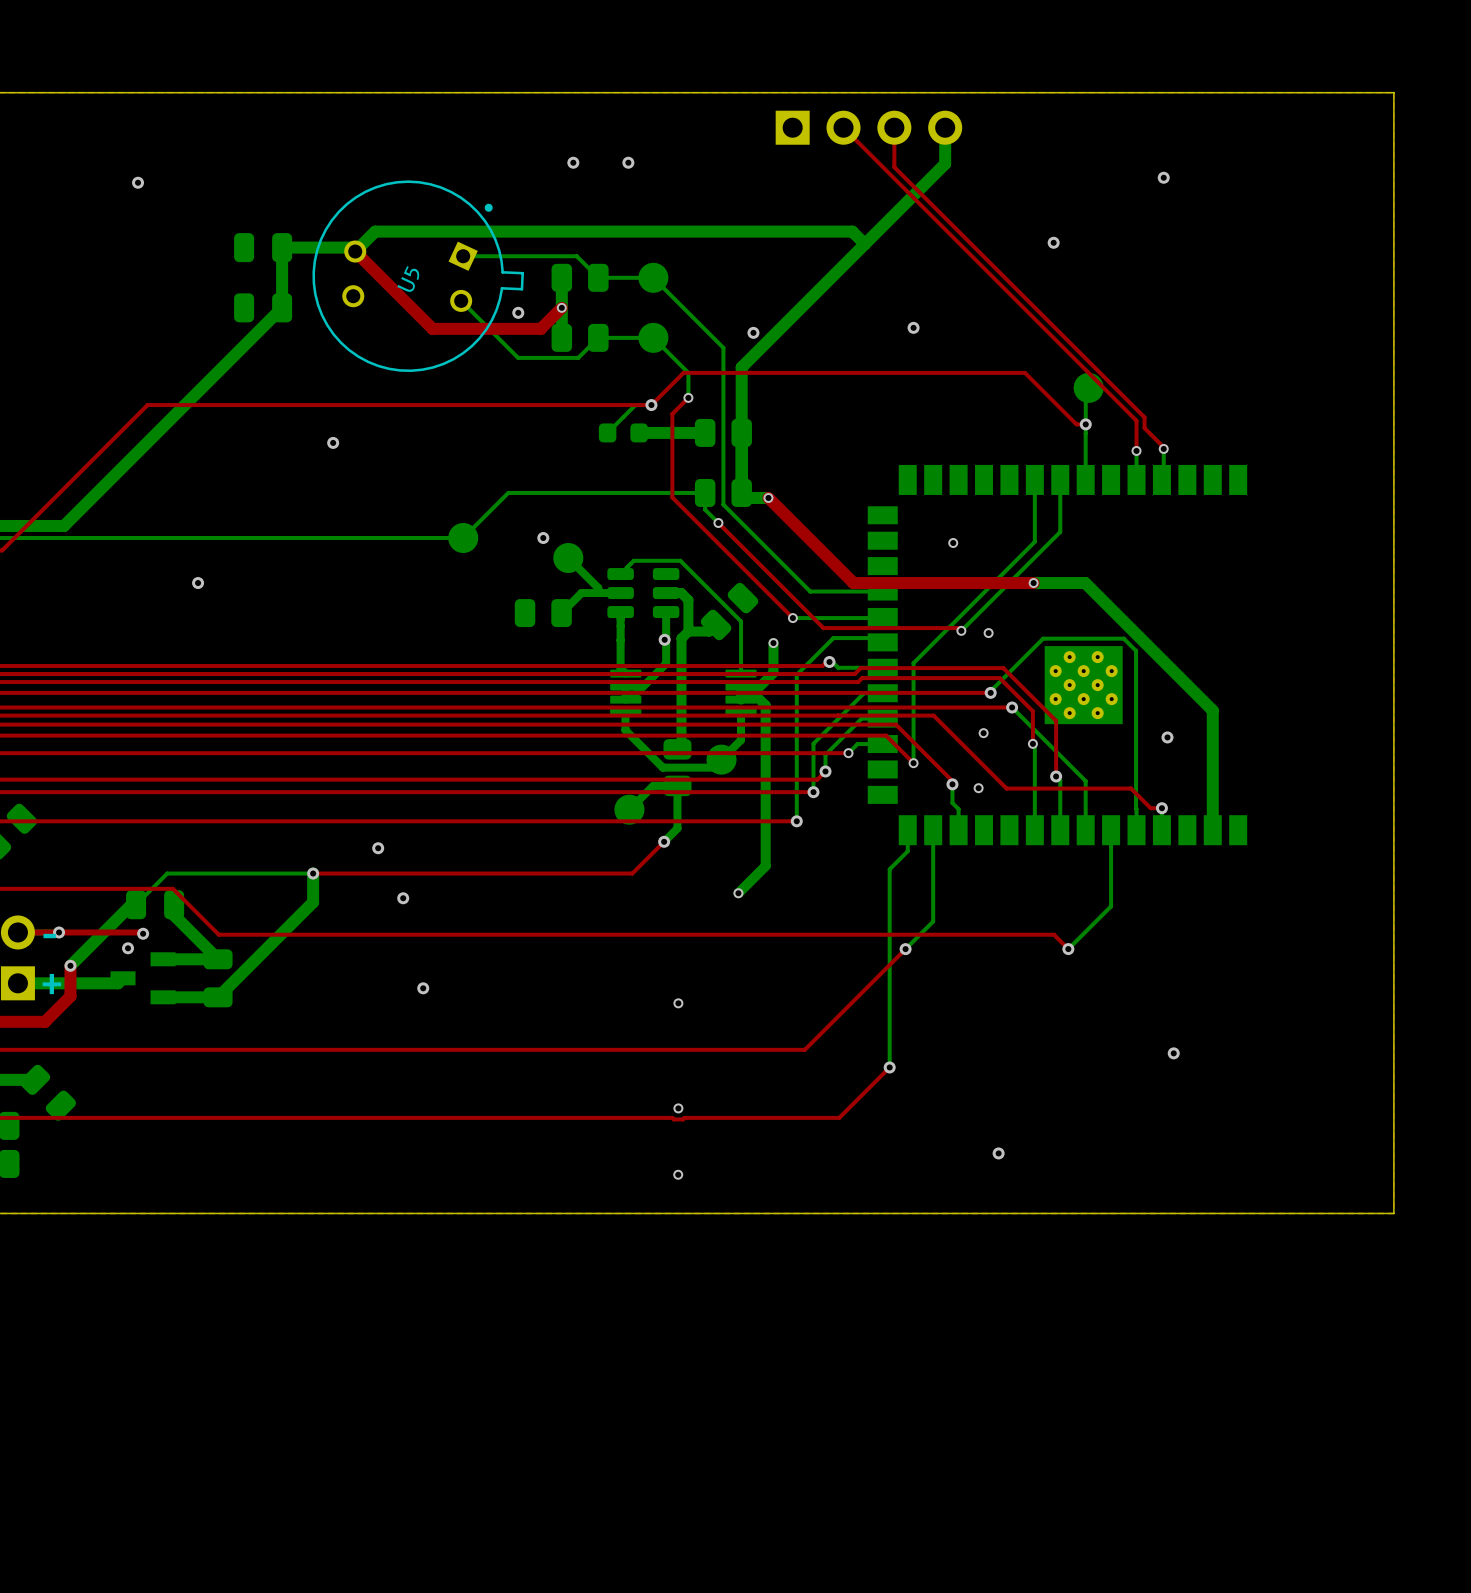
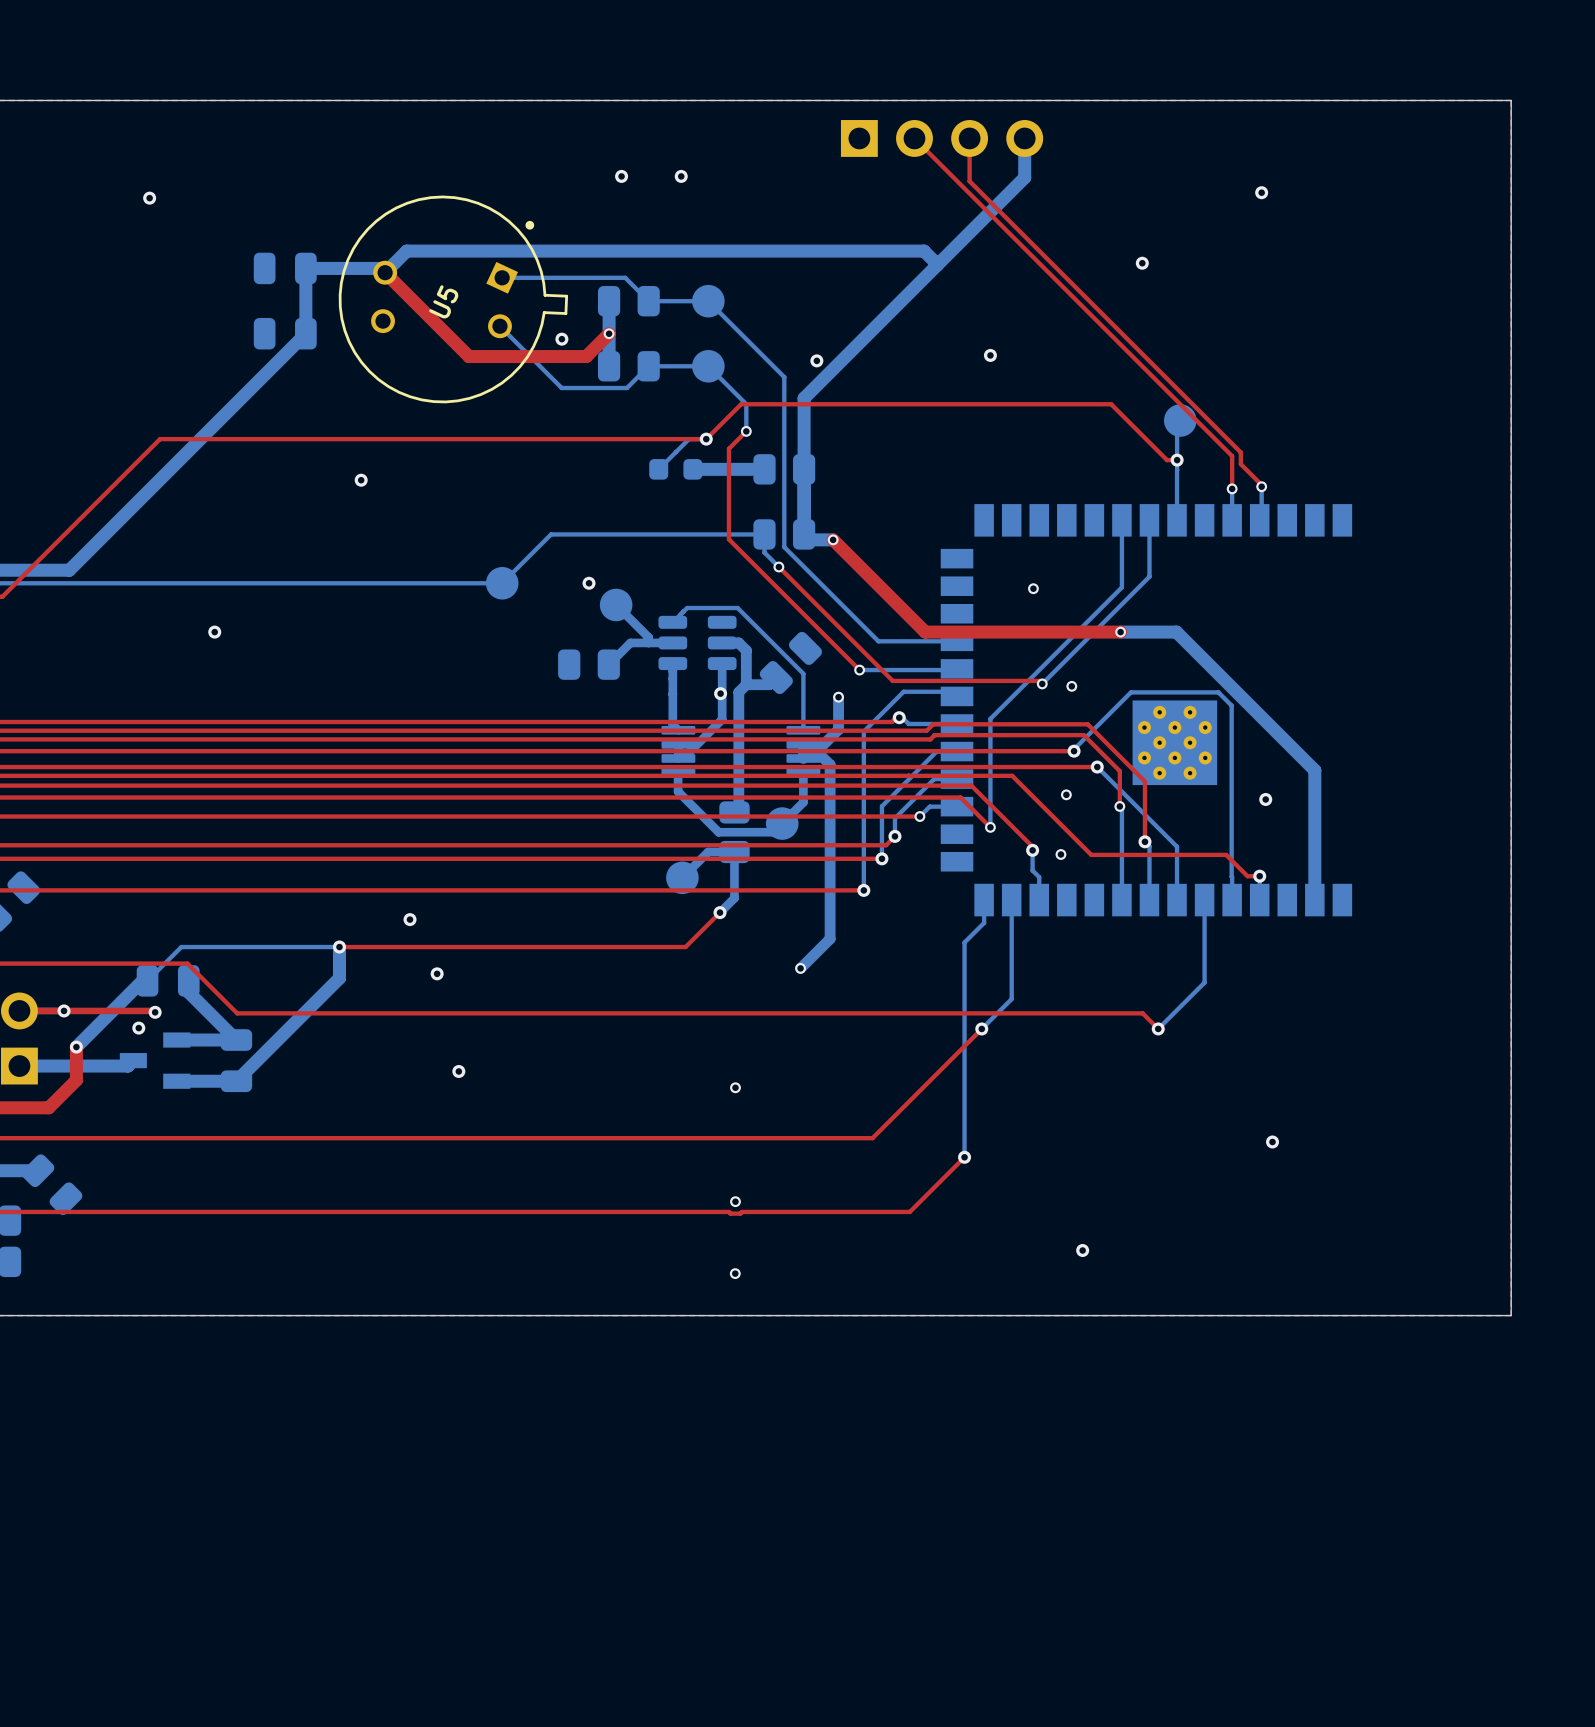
text: - (49, 936) -> none
text: + (51, 984) -> none

